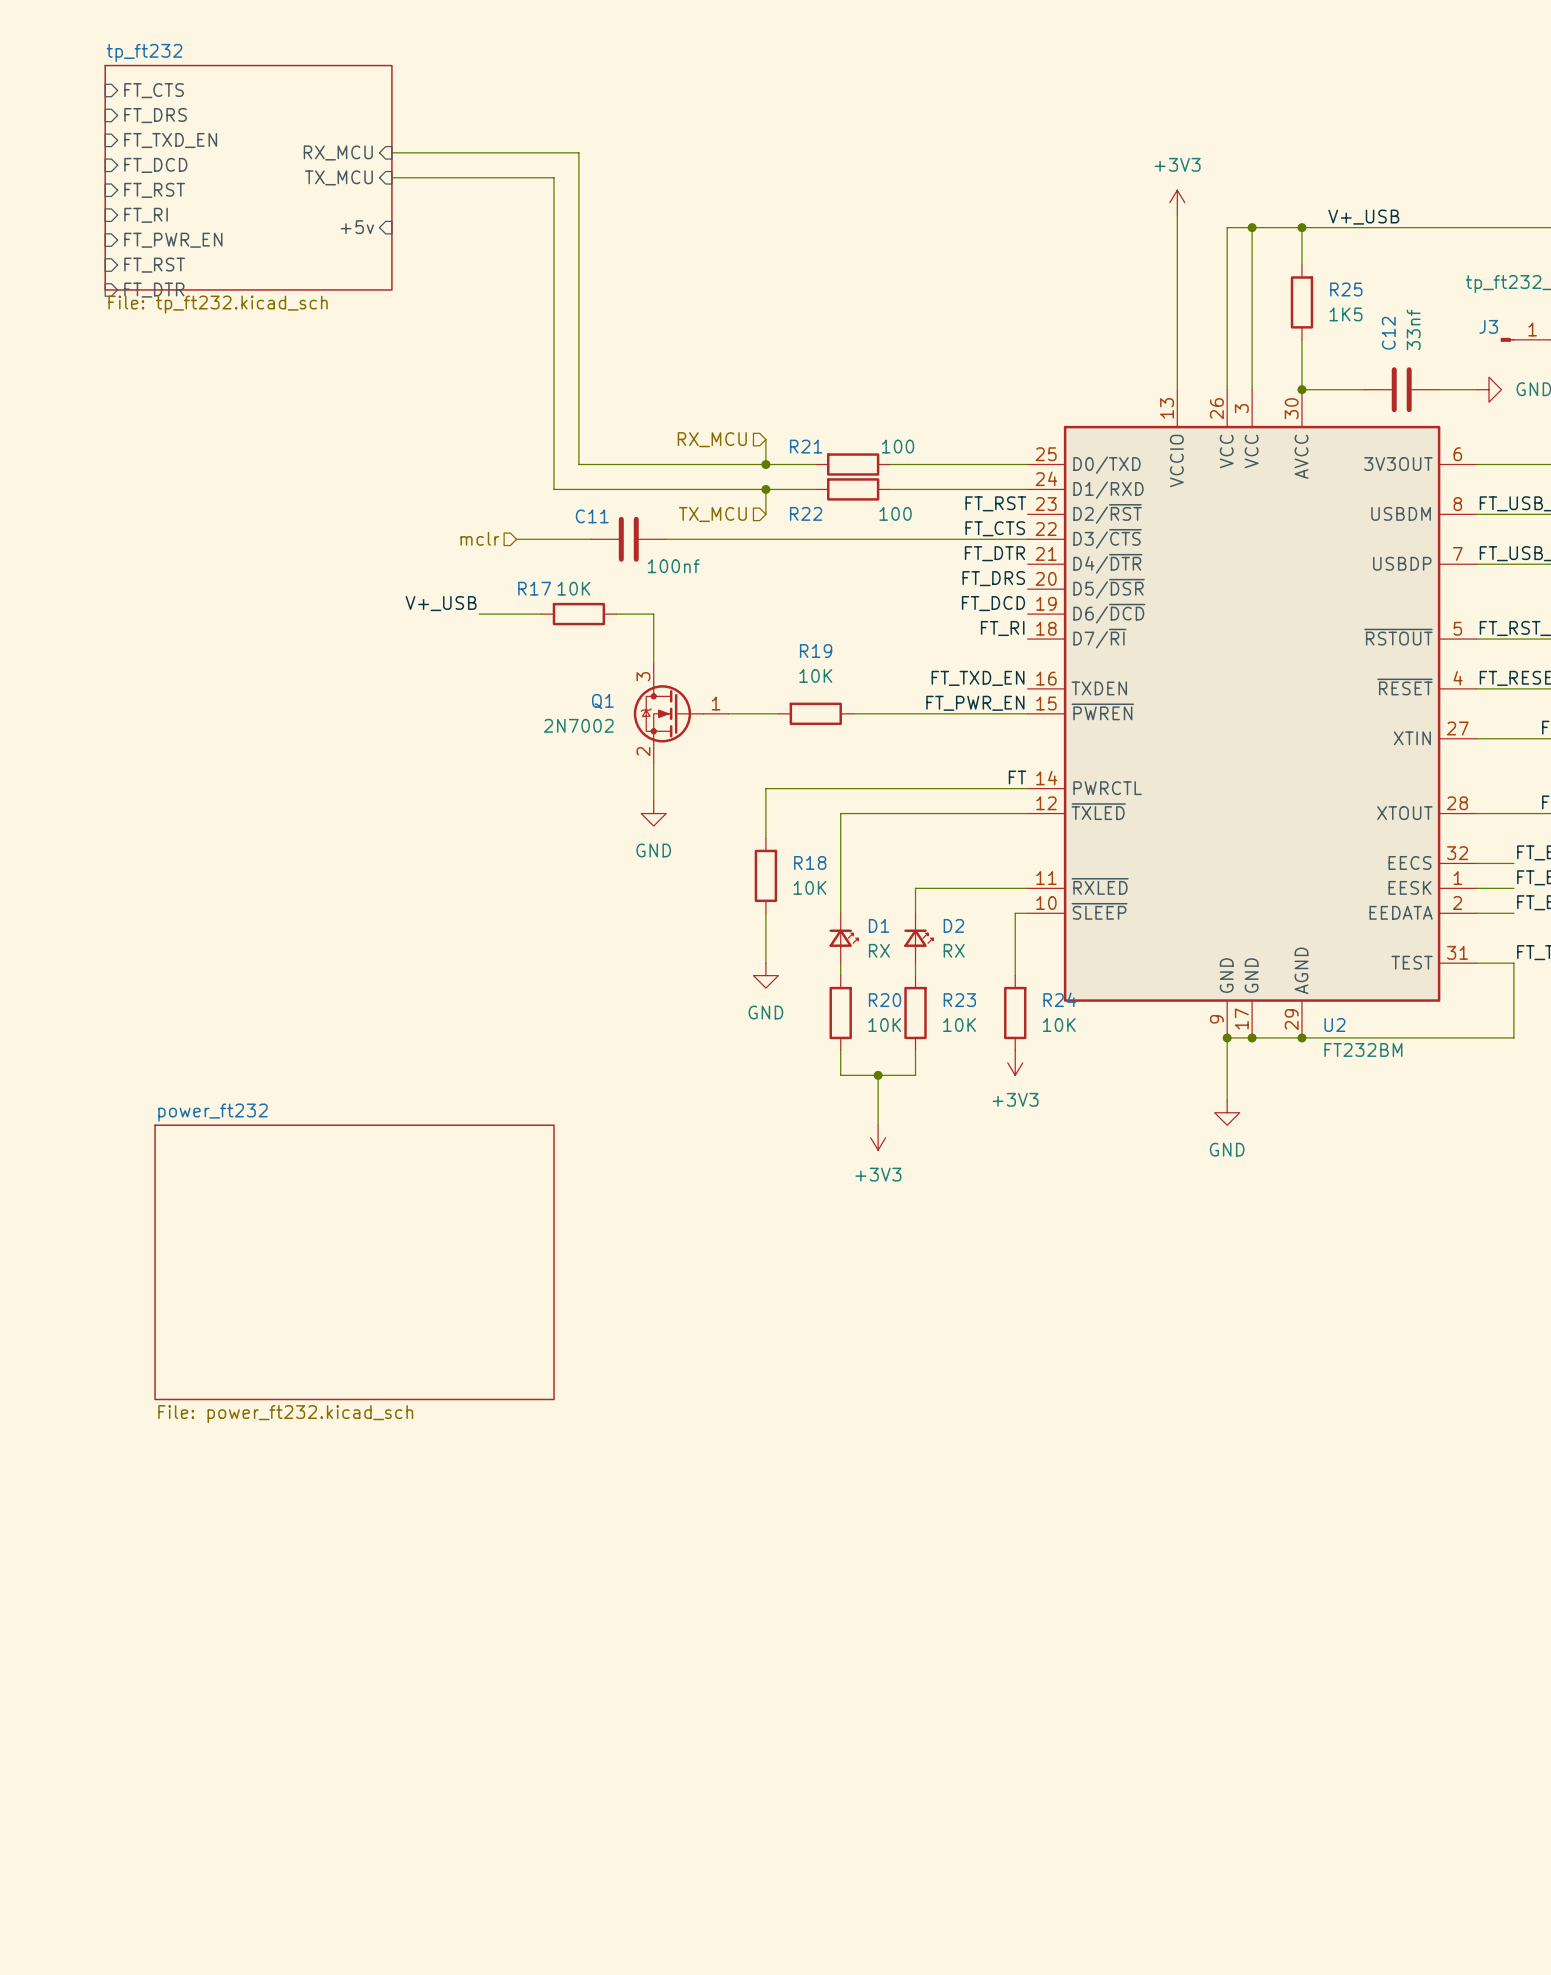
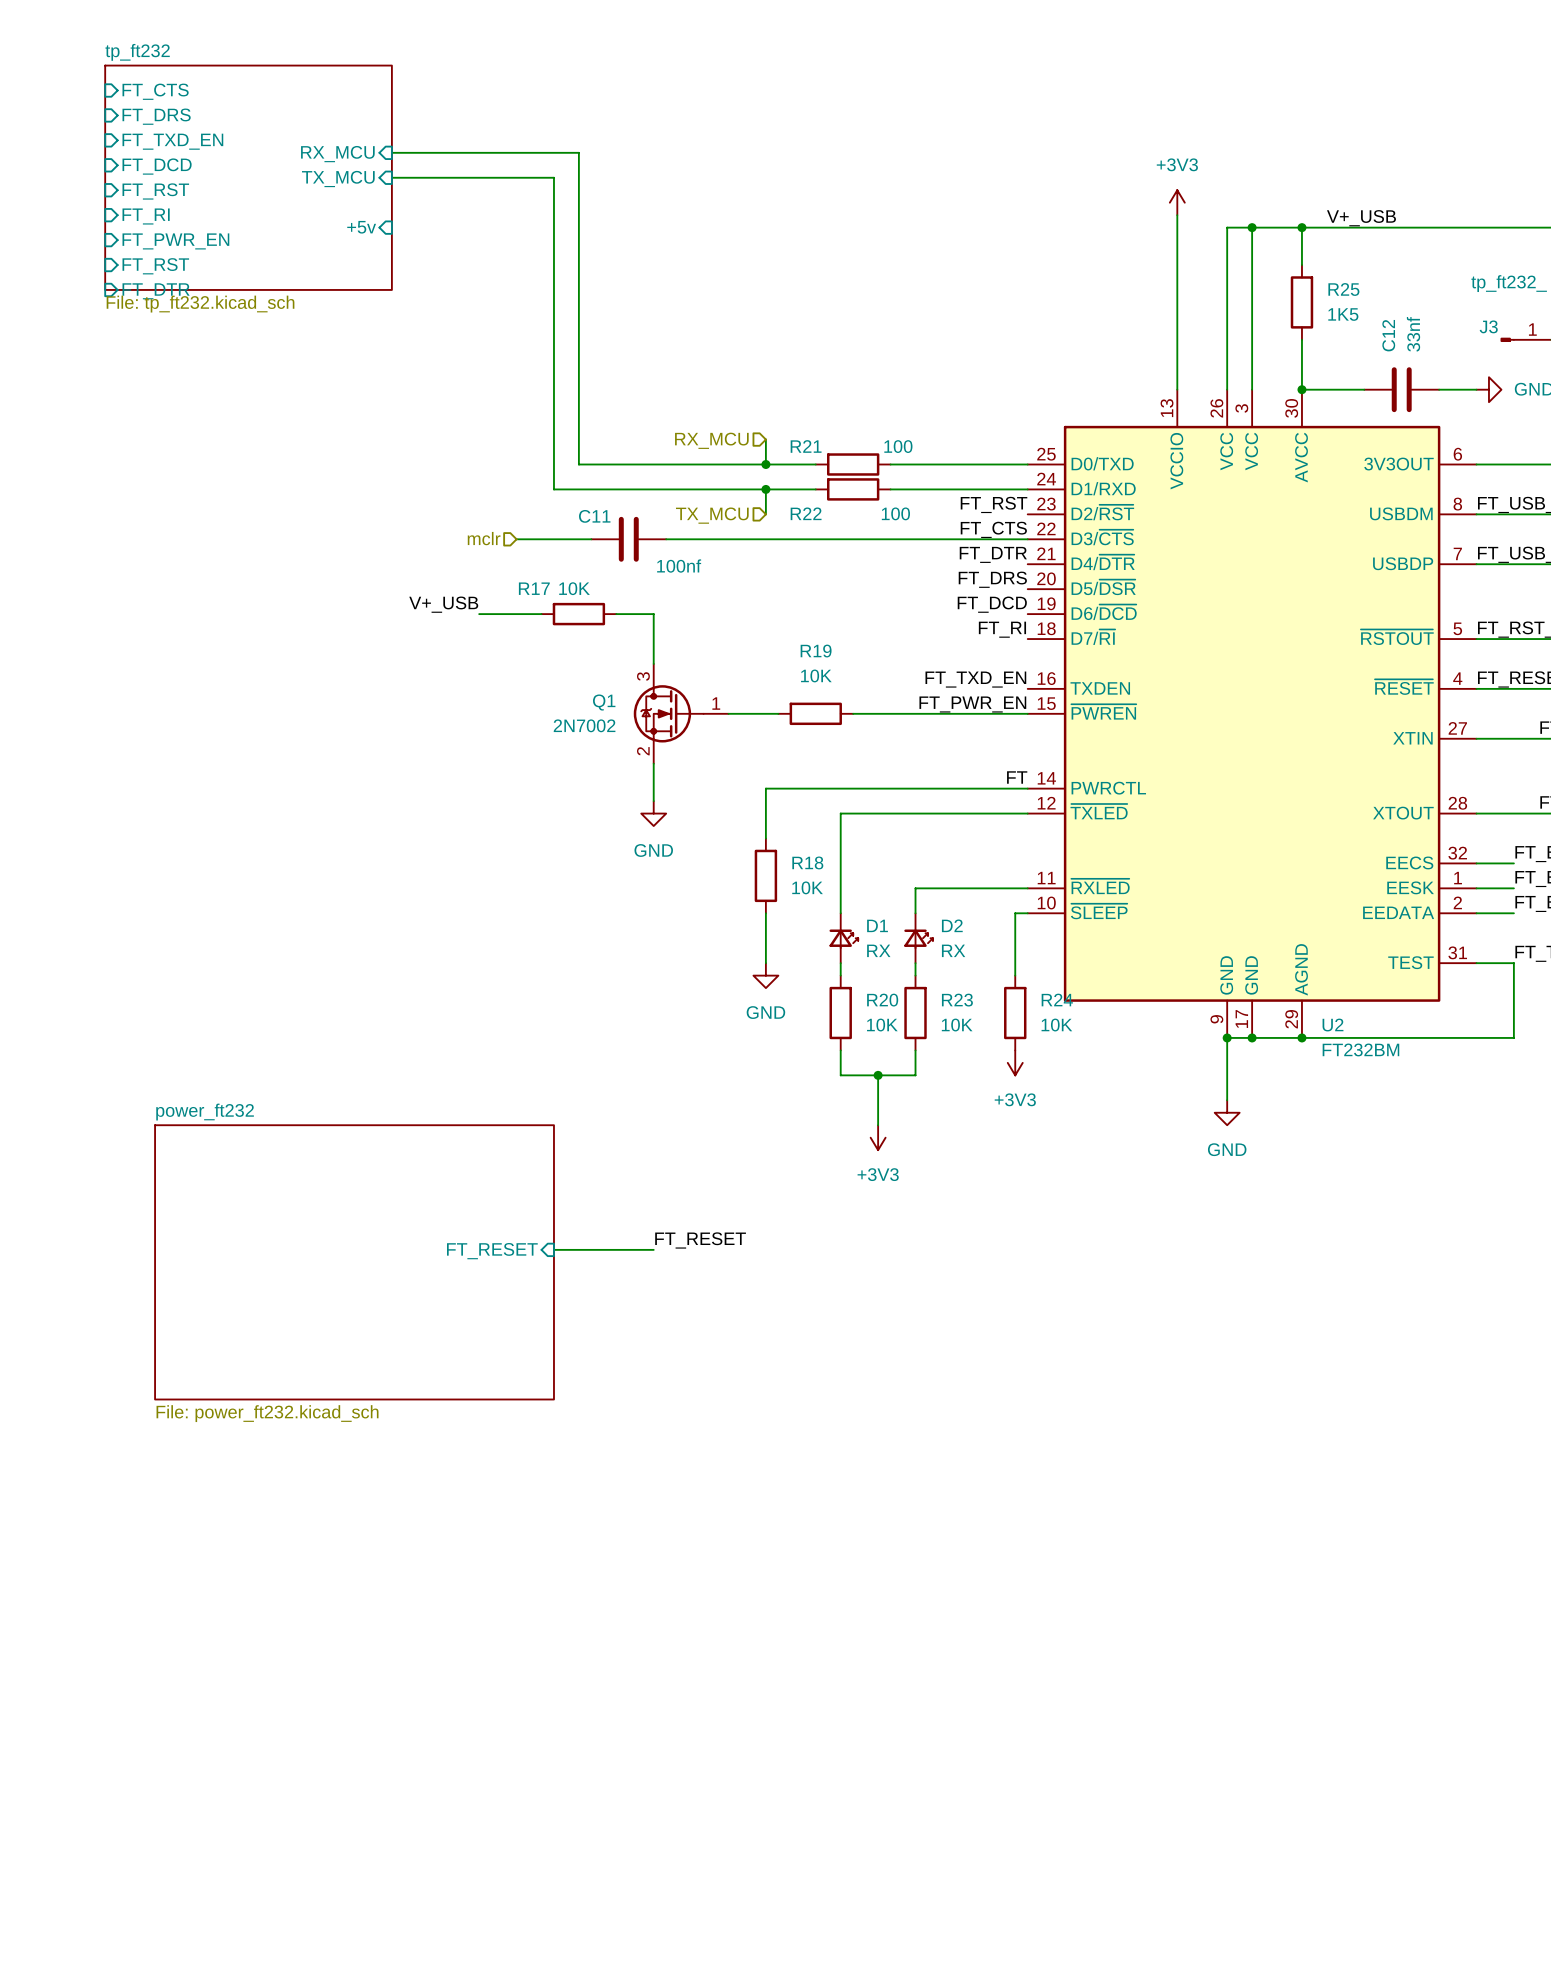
label: none -> FT_RESET (700, 1240)
wire: none -> (553, 1249) (653, 1249)
sheet pin: none -> FT_RESET (492, 1251)

